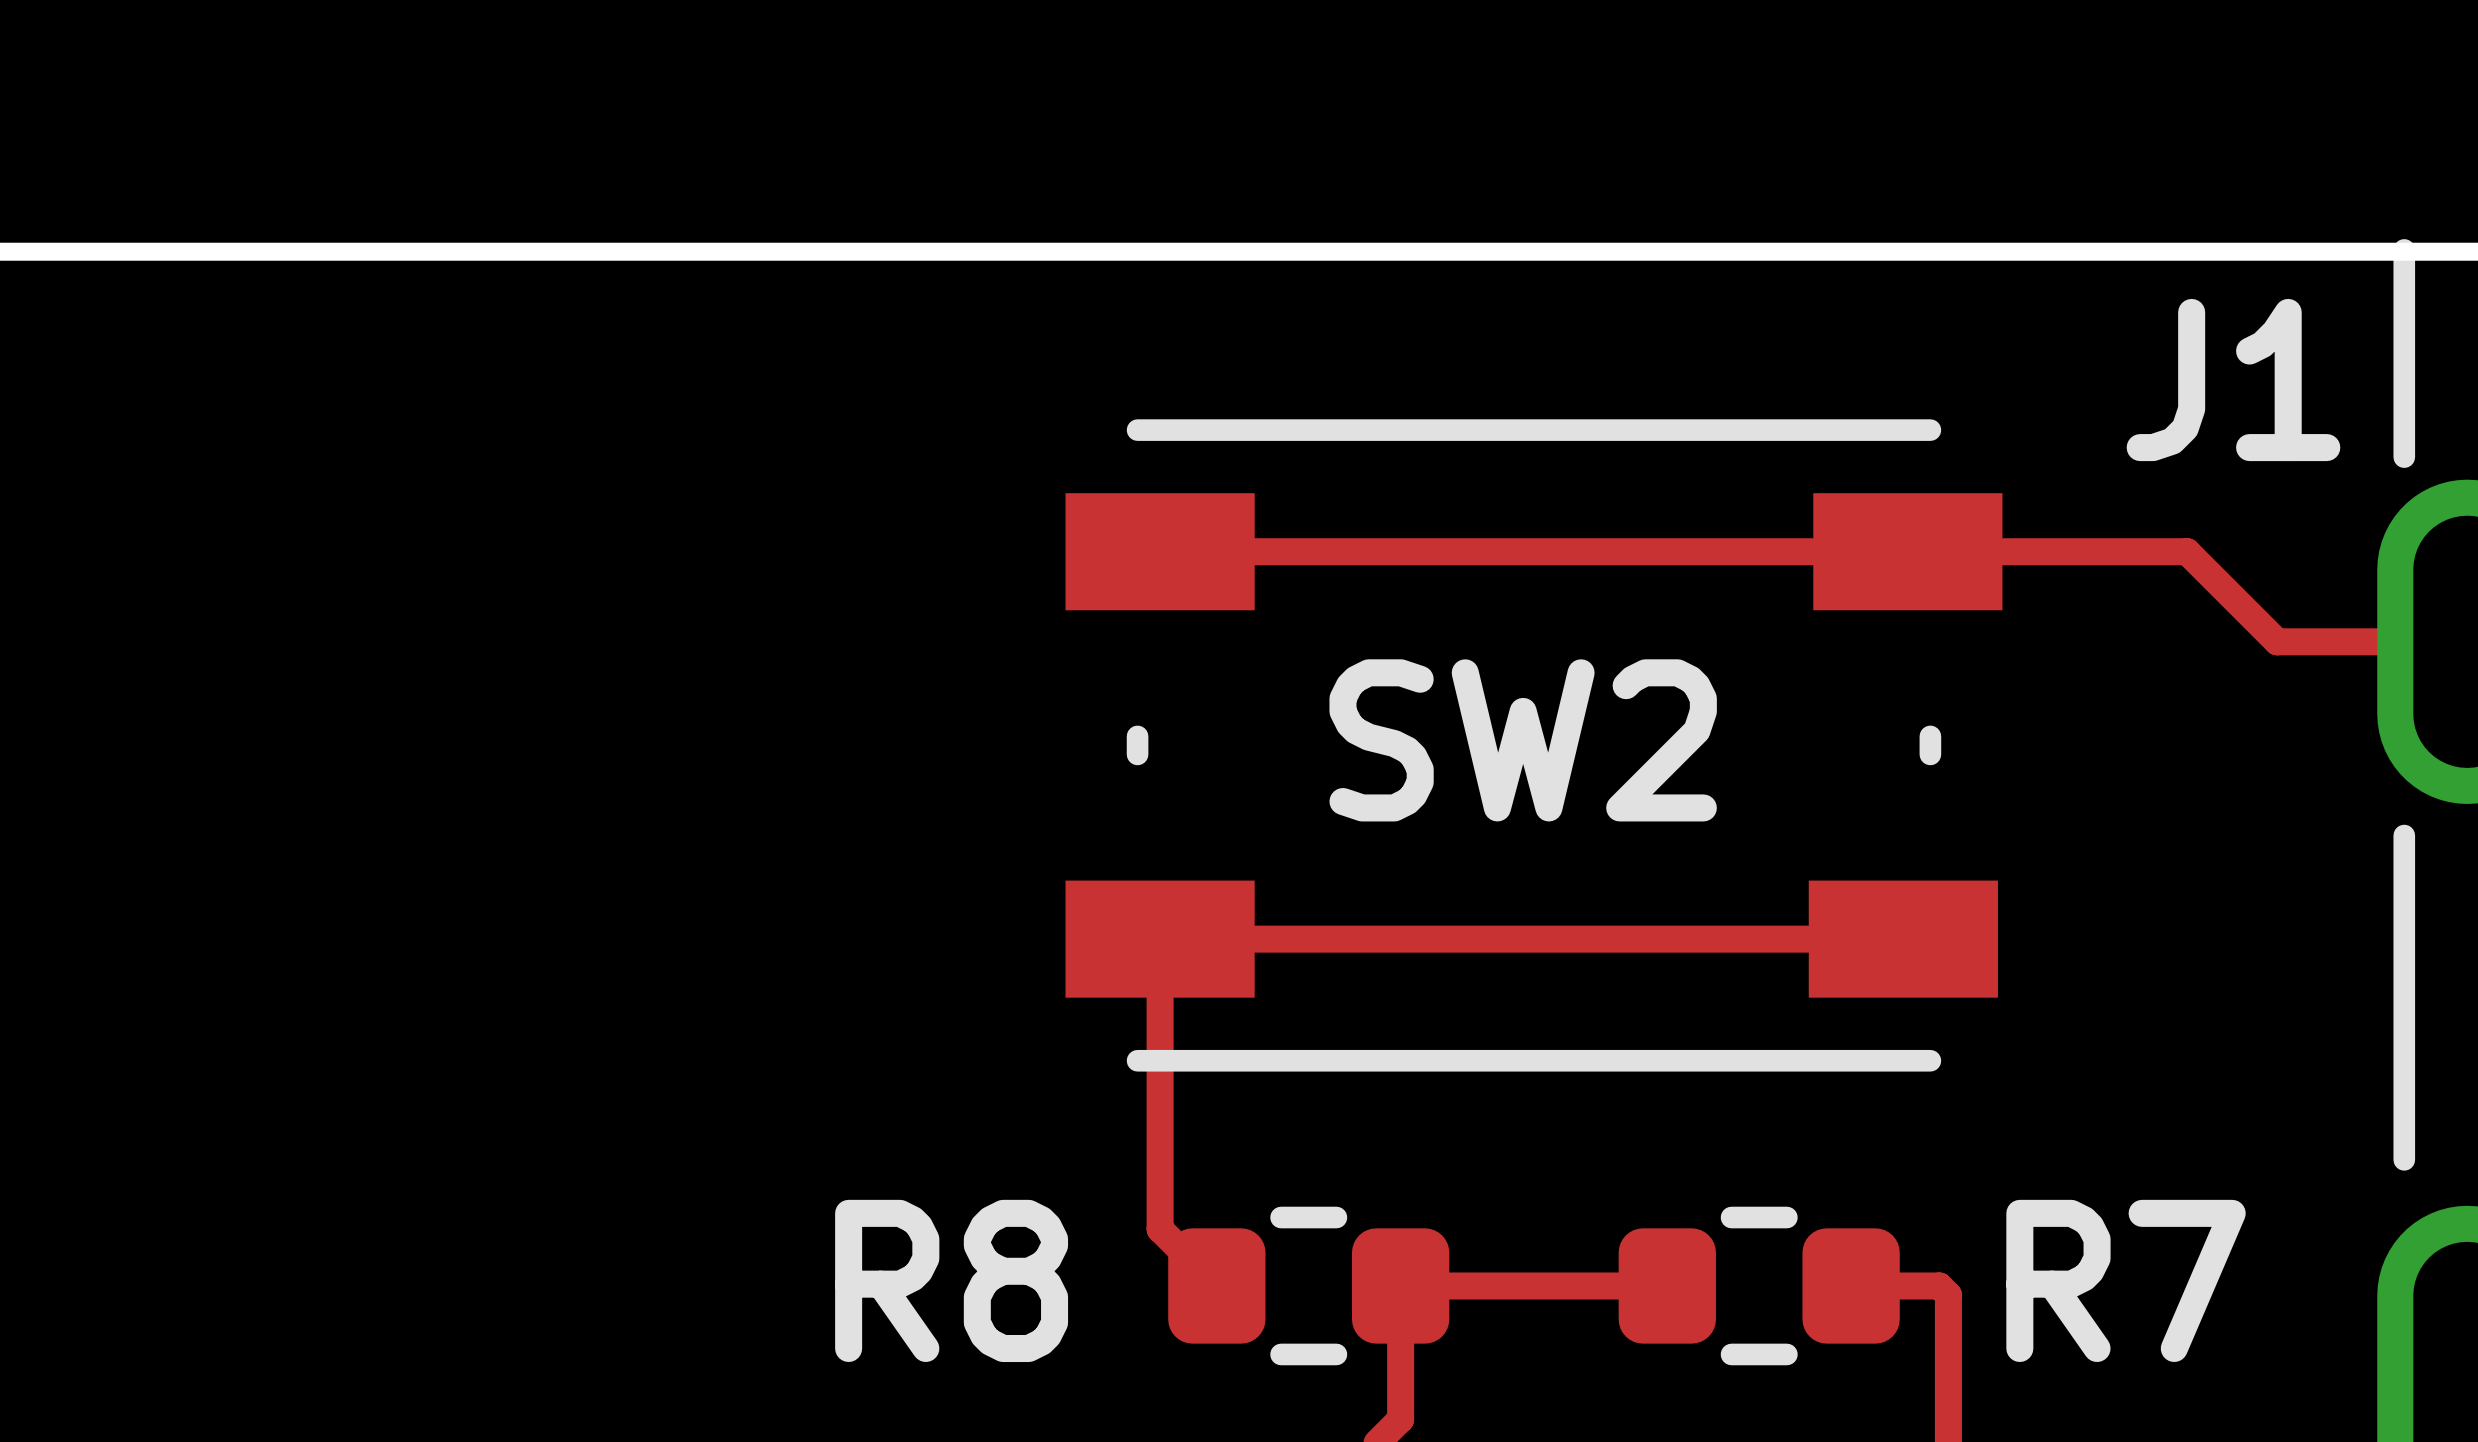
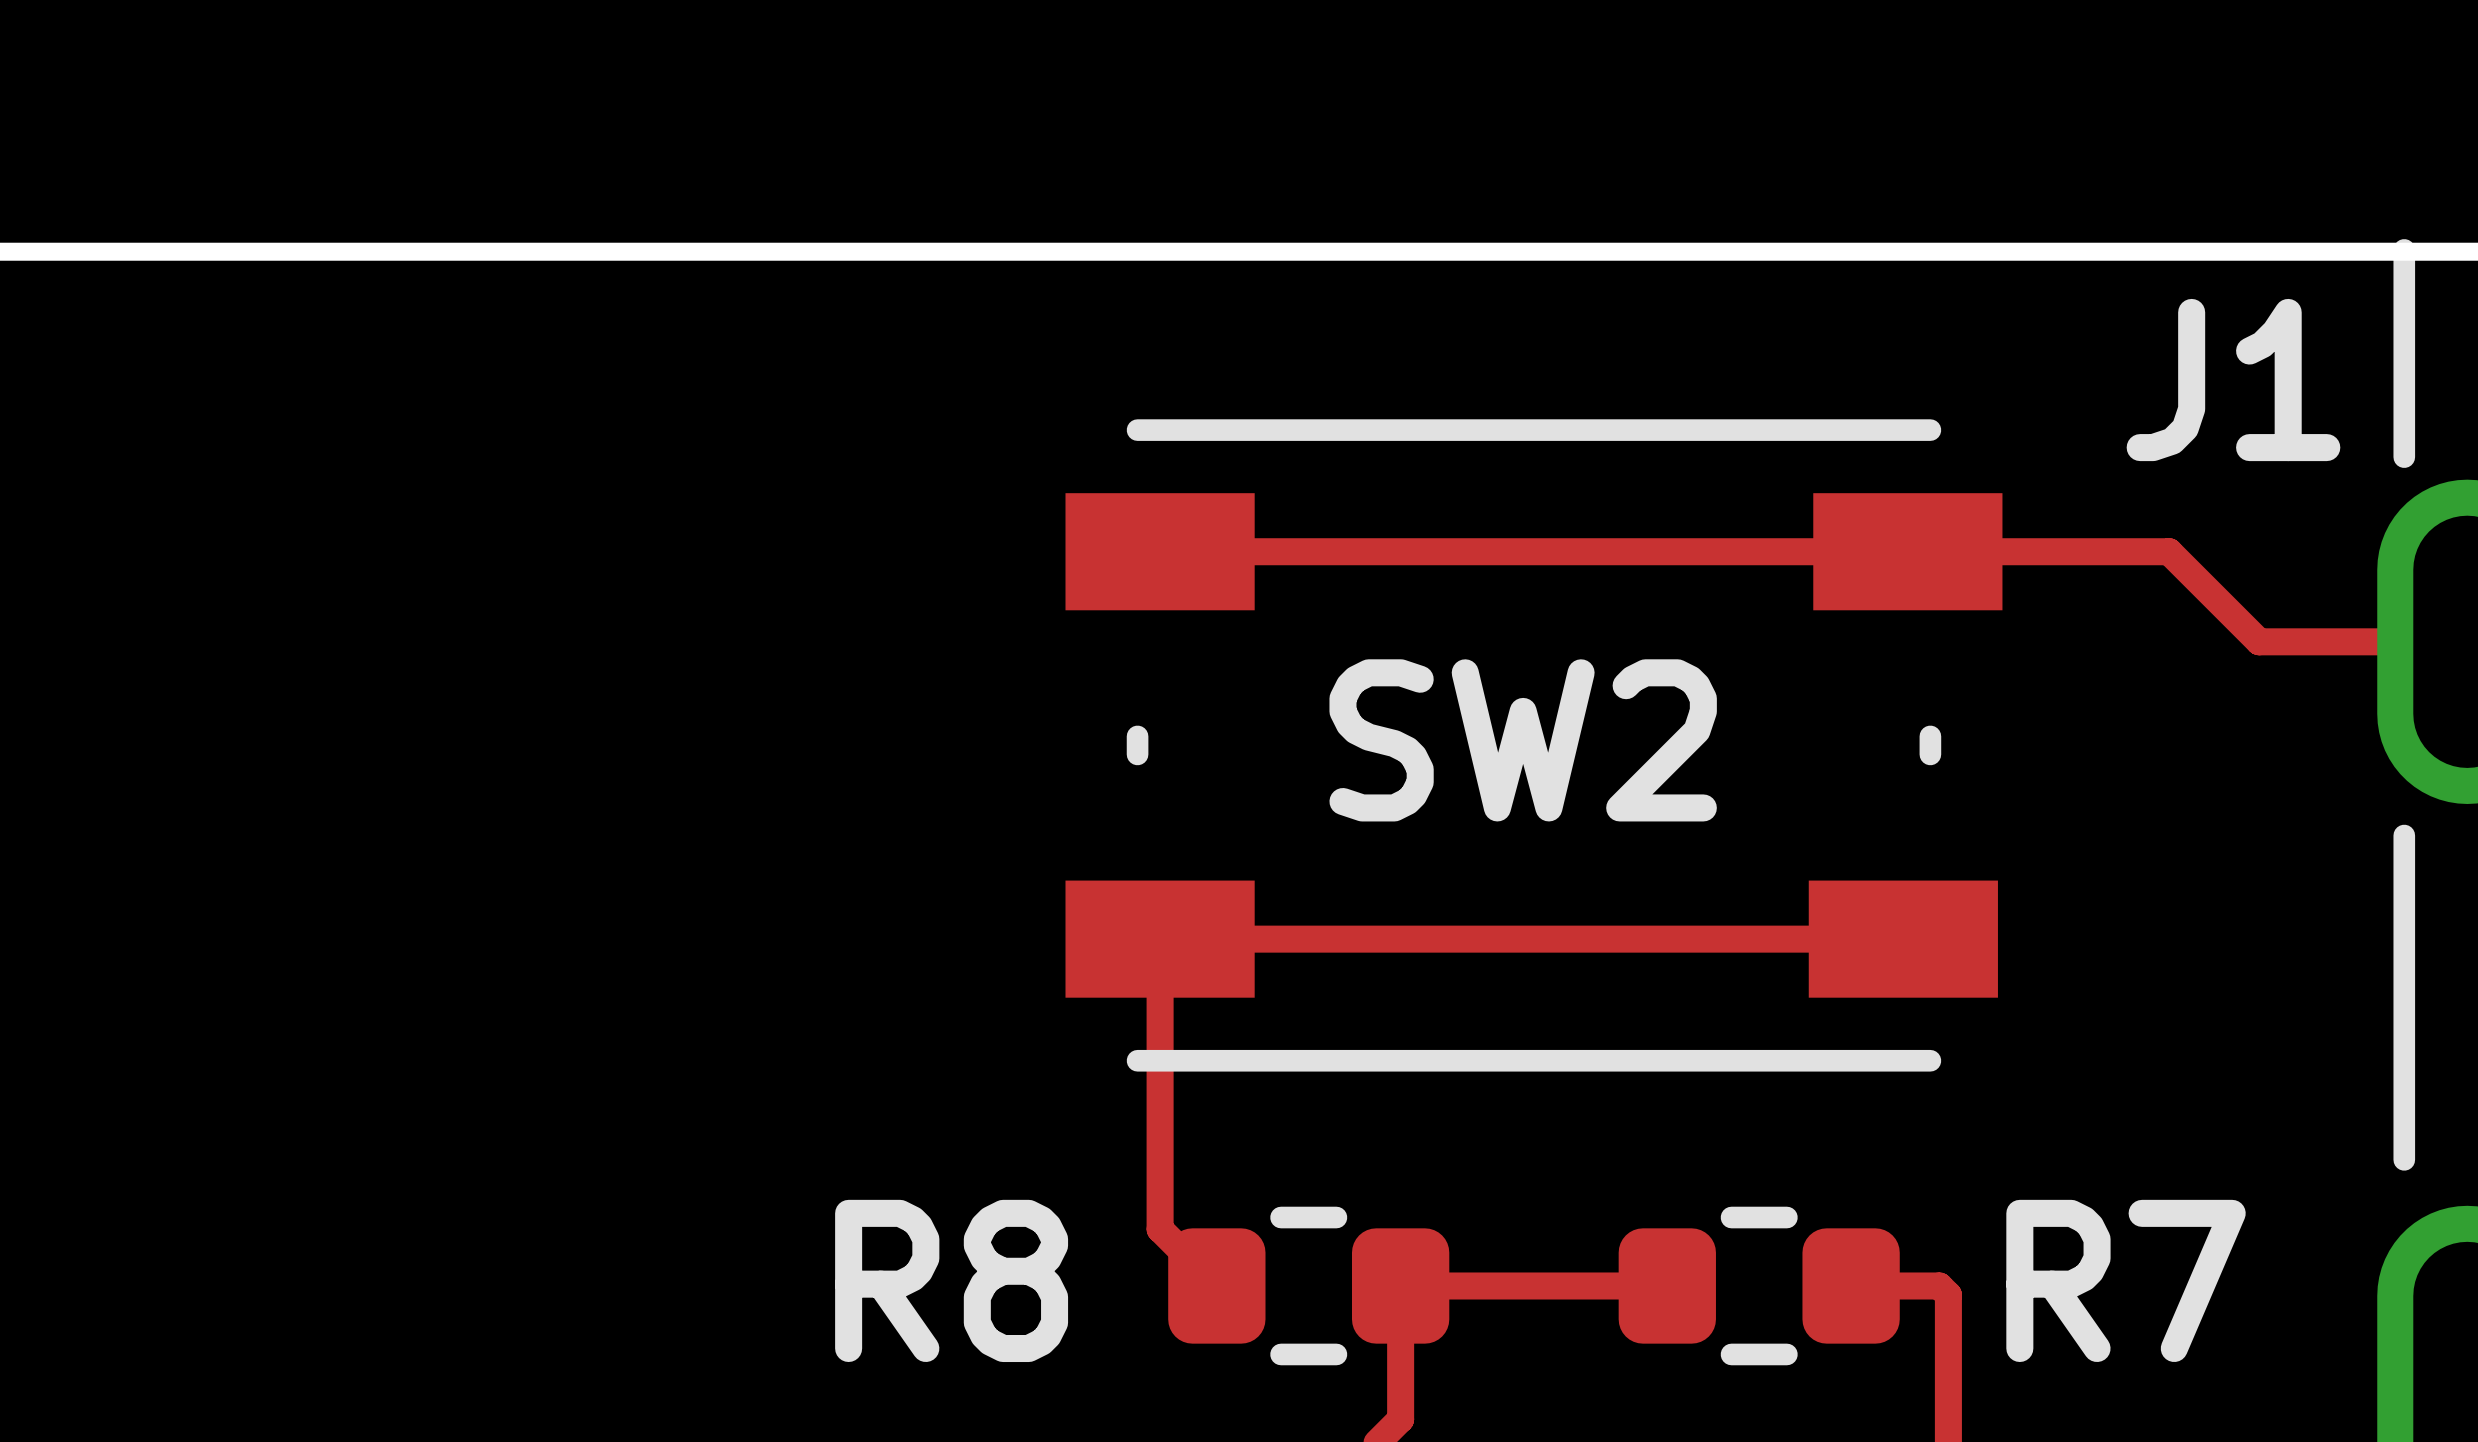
top track: (2169, 551) (2187, 551) (2277, 641) -> (2169, 551) (2259, 641) (2277, 641)

